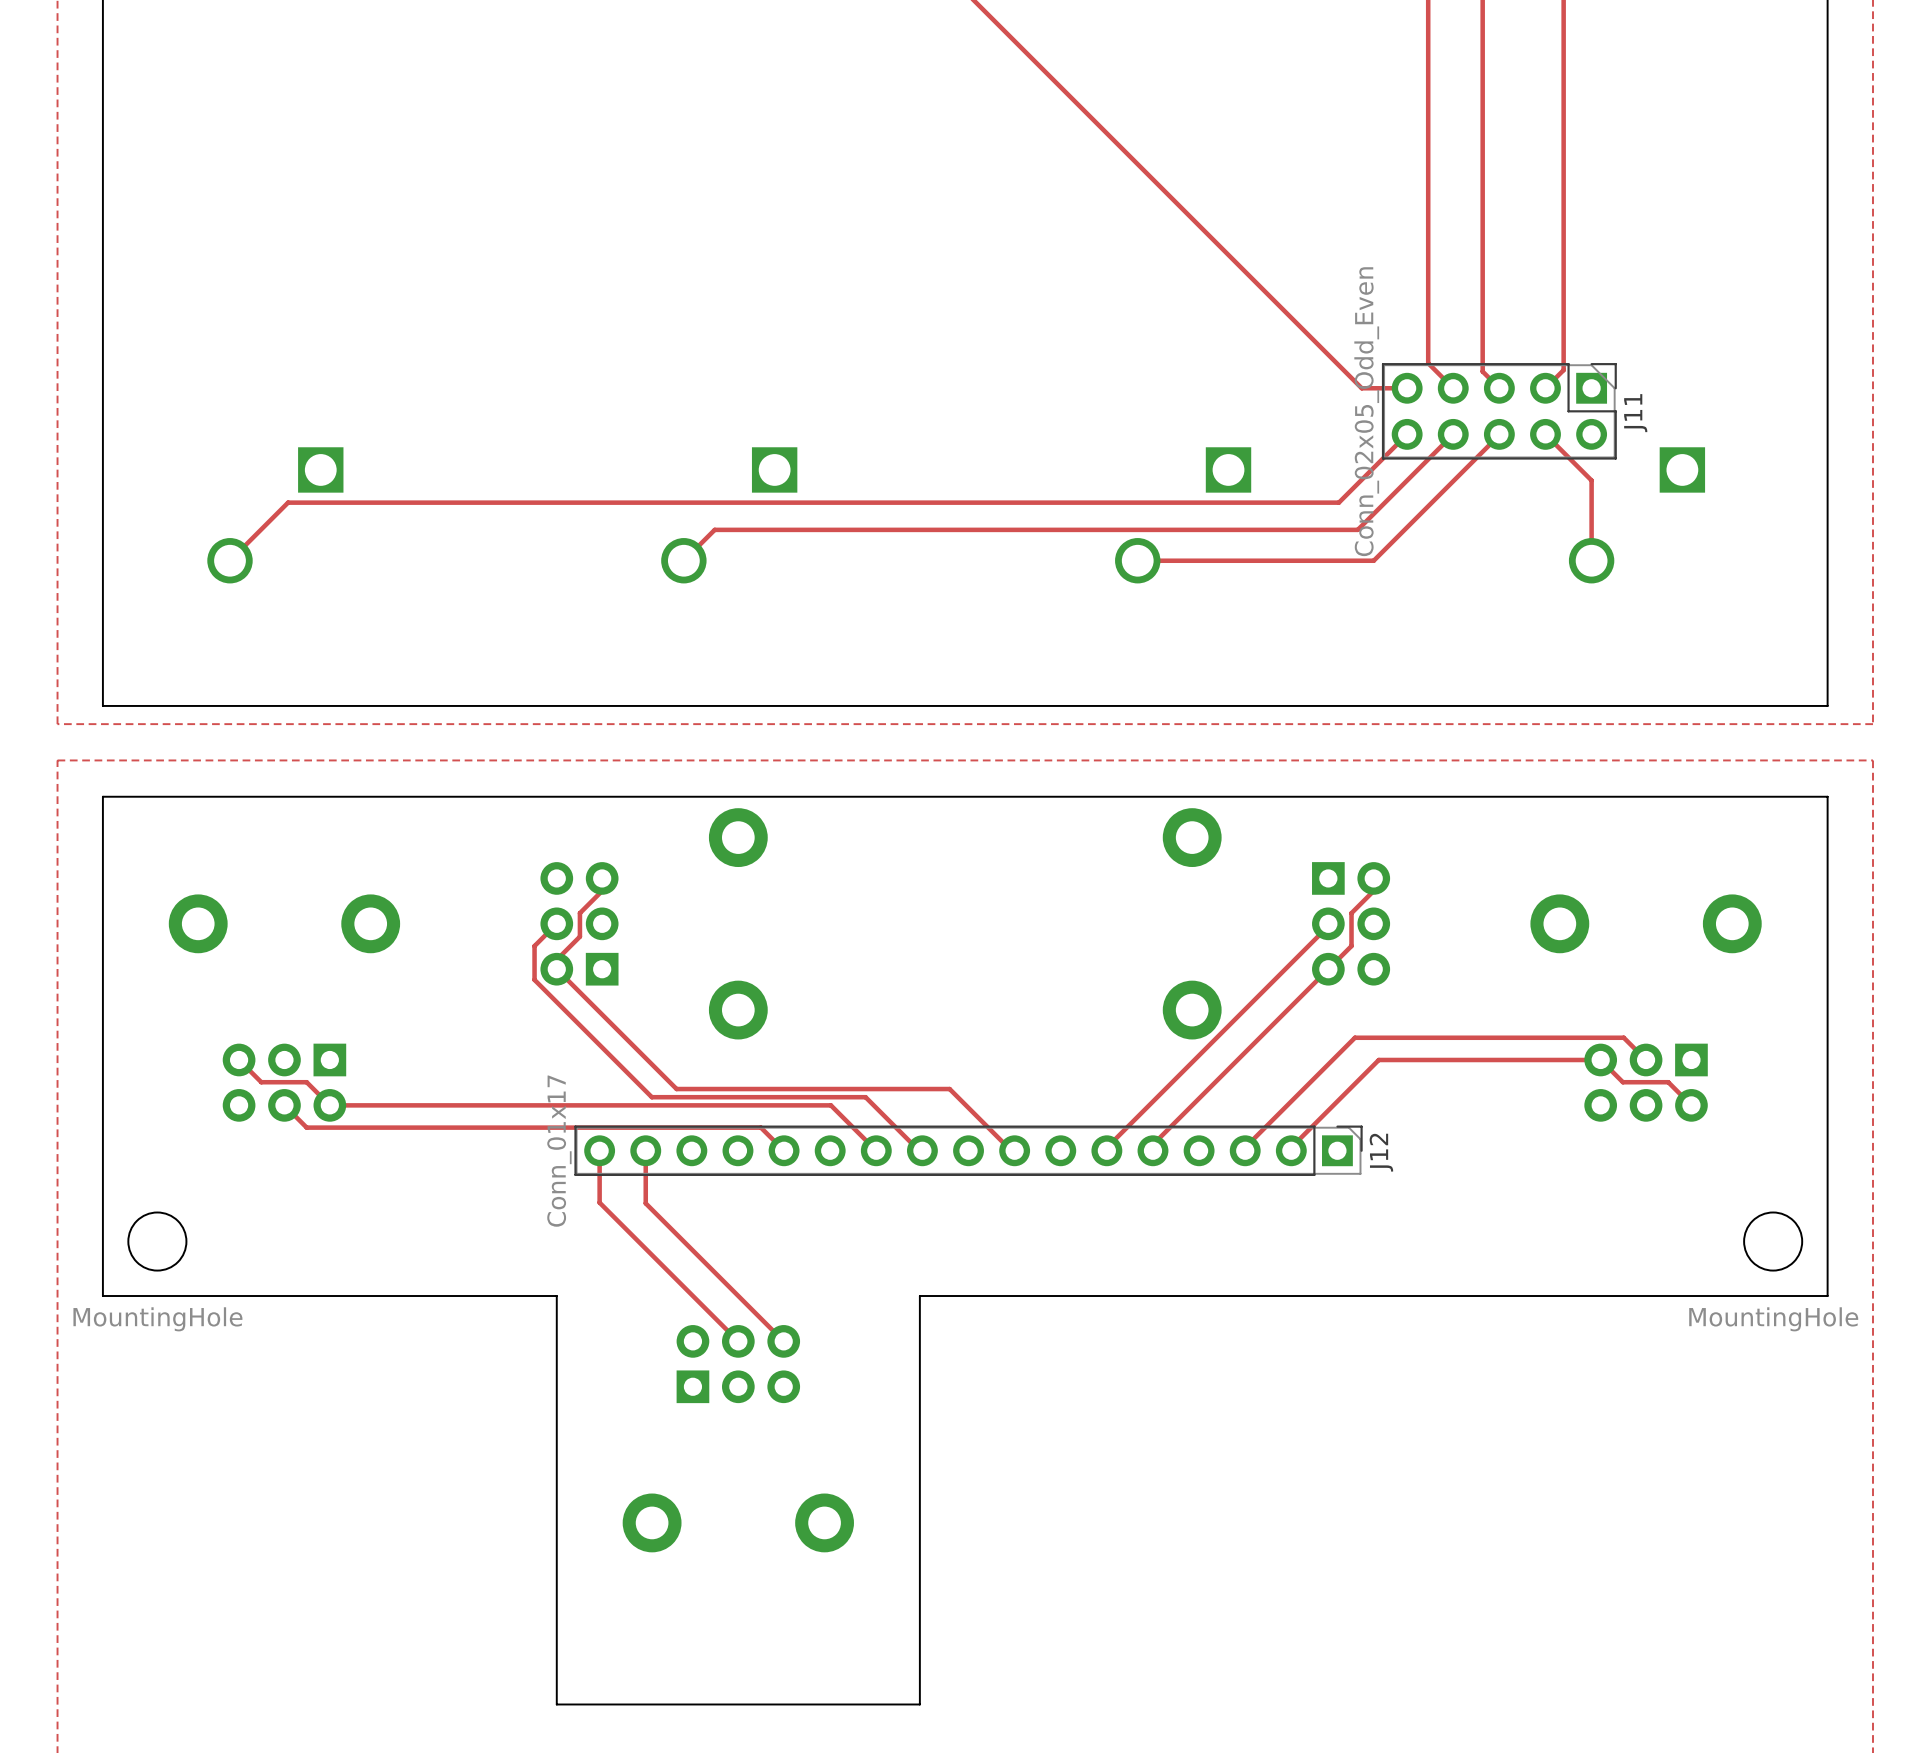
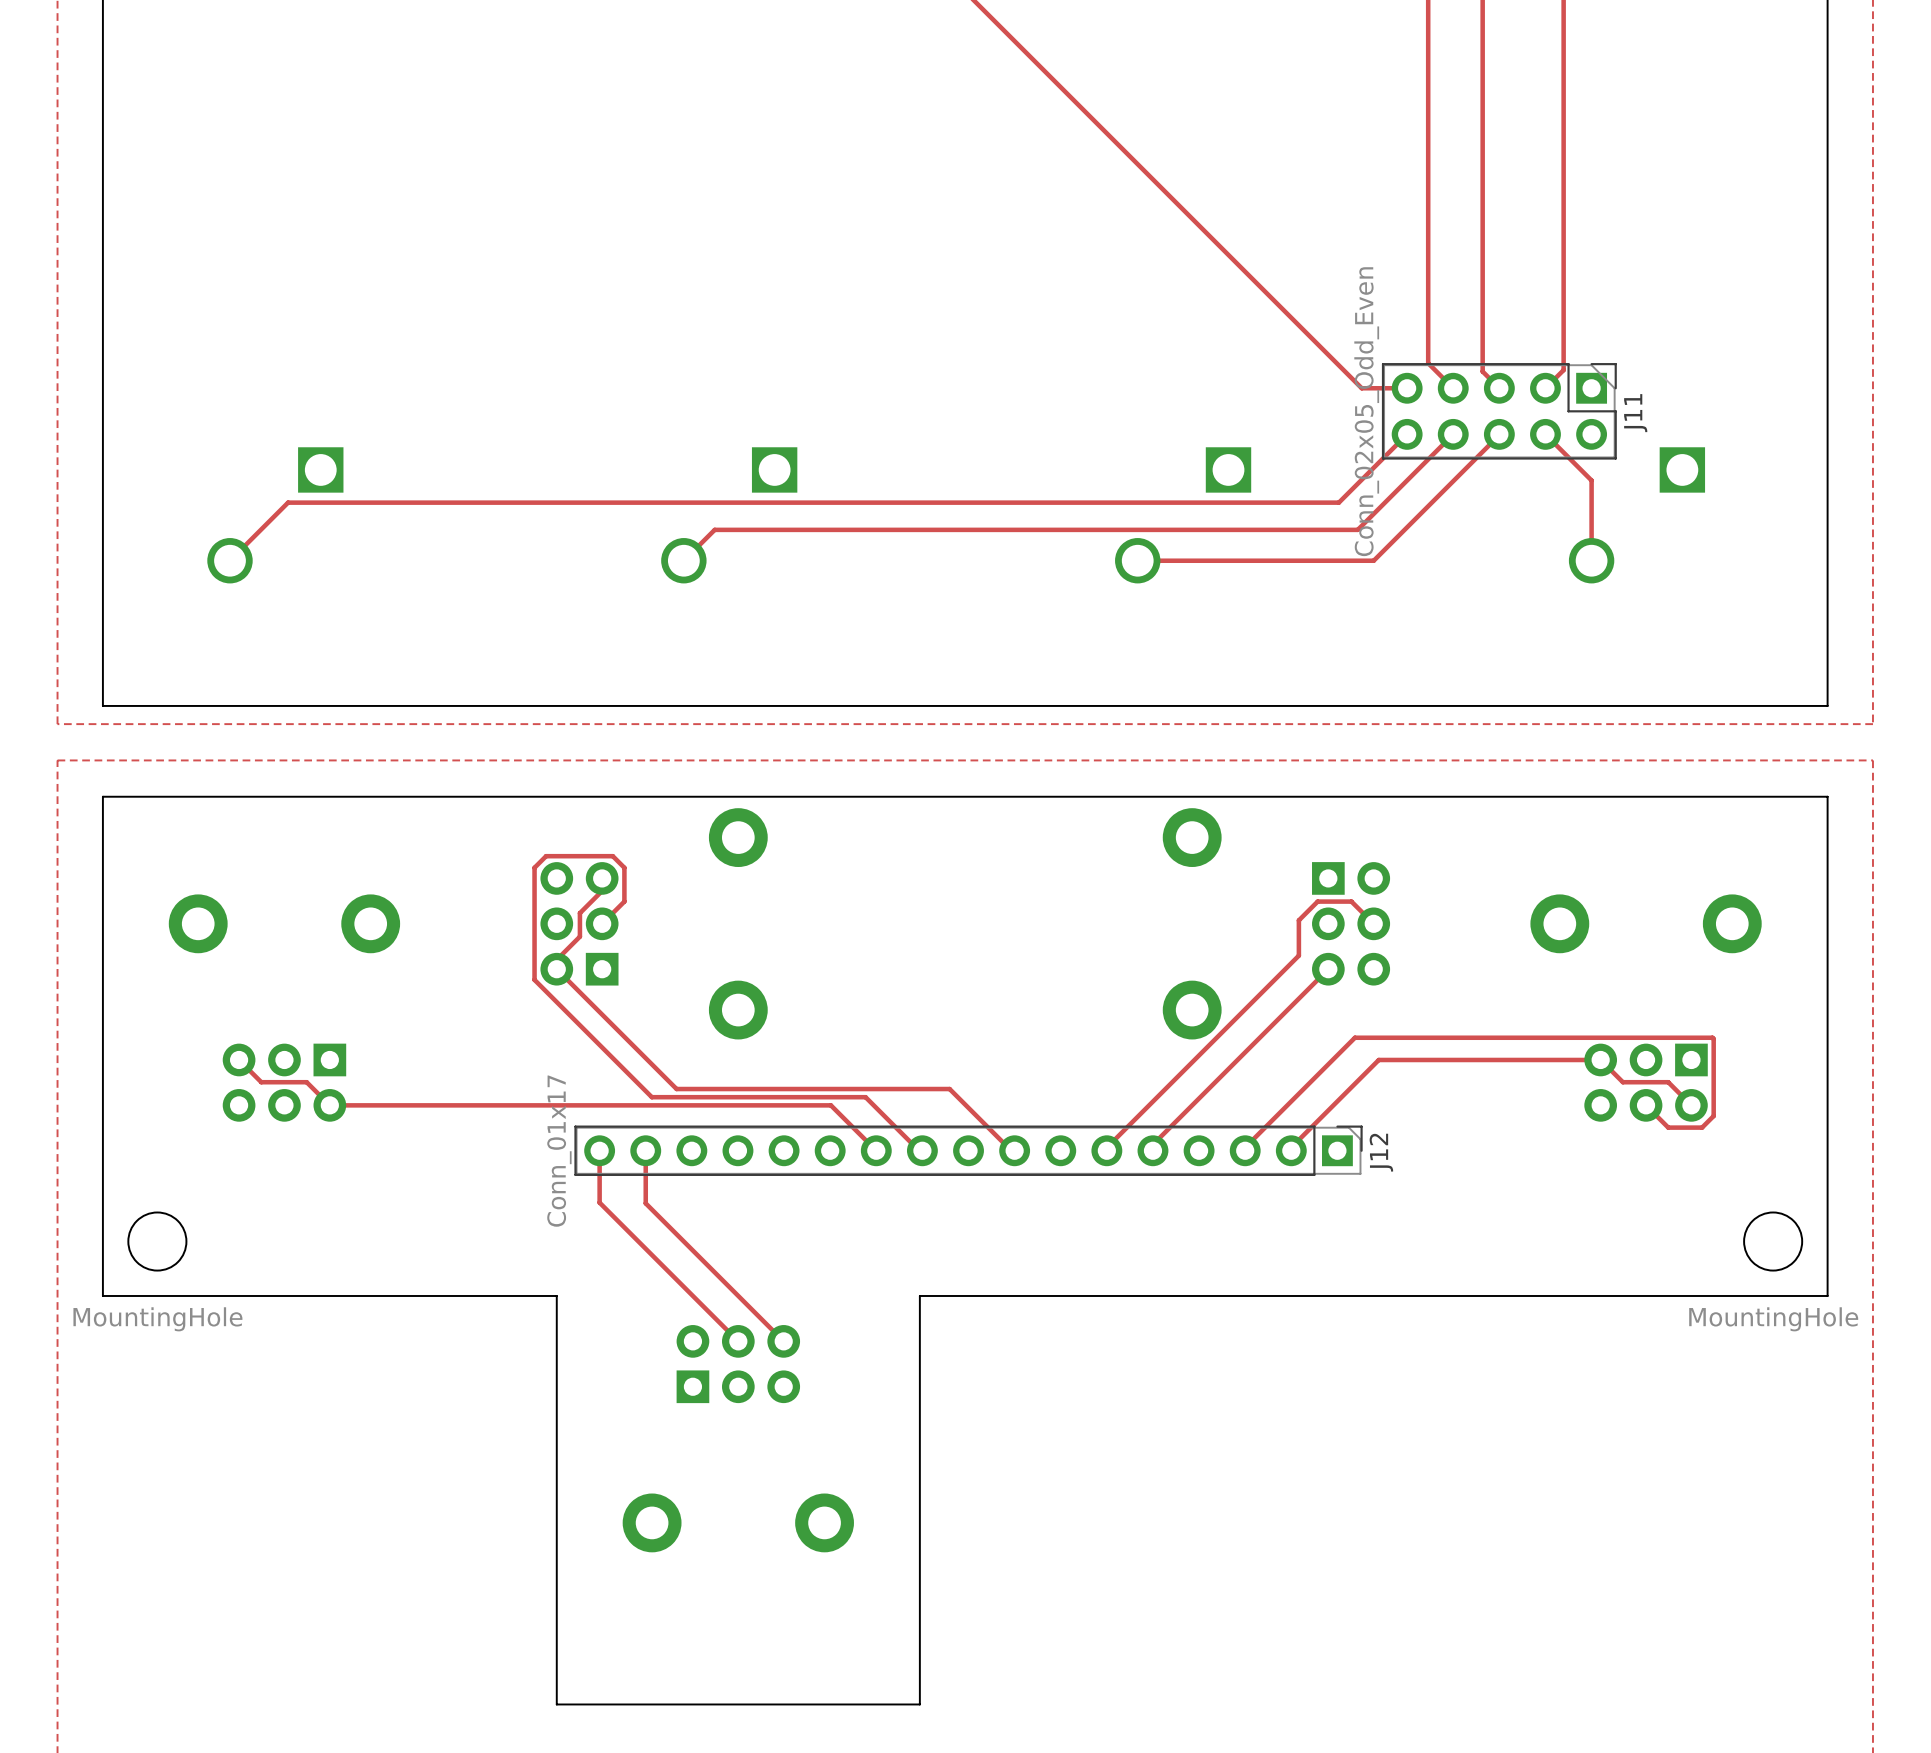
track: (1373, 878) (1373, 890) (1351, 913) (1351, 946) (1328, 969) -> none
track: (556, 923) (534, 946) -> (602, 923) (624, 901) (624, 867) (612, 856) (546, 856) (534, 867) (534, 946)
track: (1328, 923) (1328, 926) (1298, 955) -> (1373, 923) (1351, 901) (1317, 901) (1298, 920) (1298, 955)
track: (1623, 1037) (1646, 1059) -> (1623, 1037) (1713, 1038) (1713, 1116) (1702, 1127) (1668, 1127) (1646, 1105)
track: (284, 1105) (306, 1127) (760, 1127) (784, 1150) -> none

